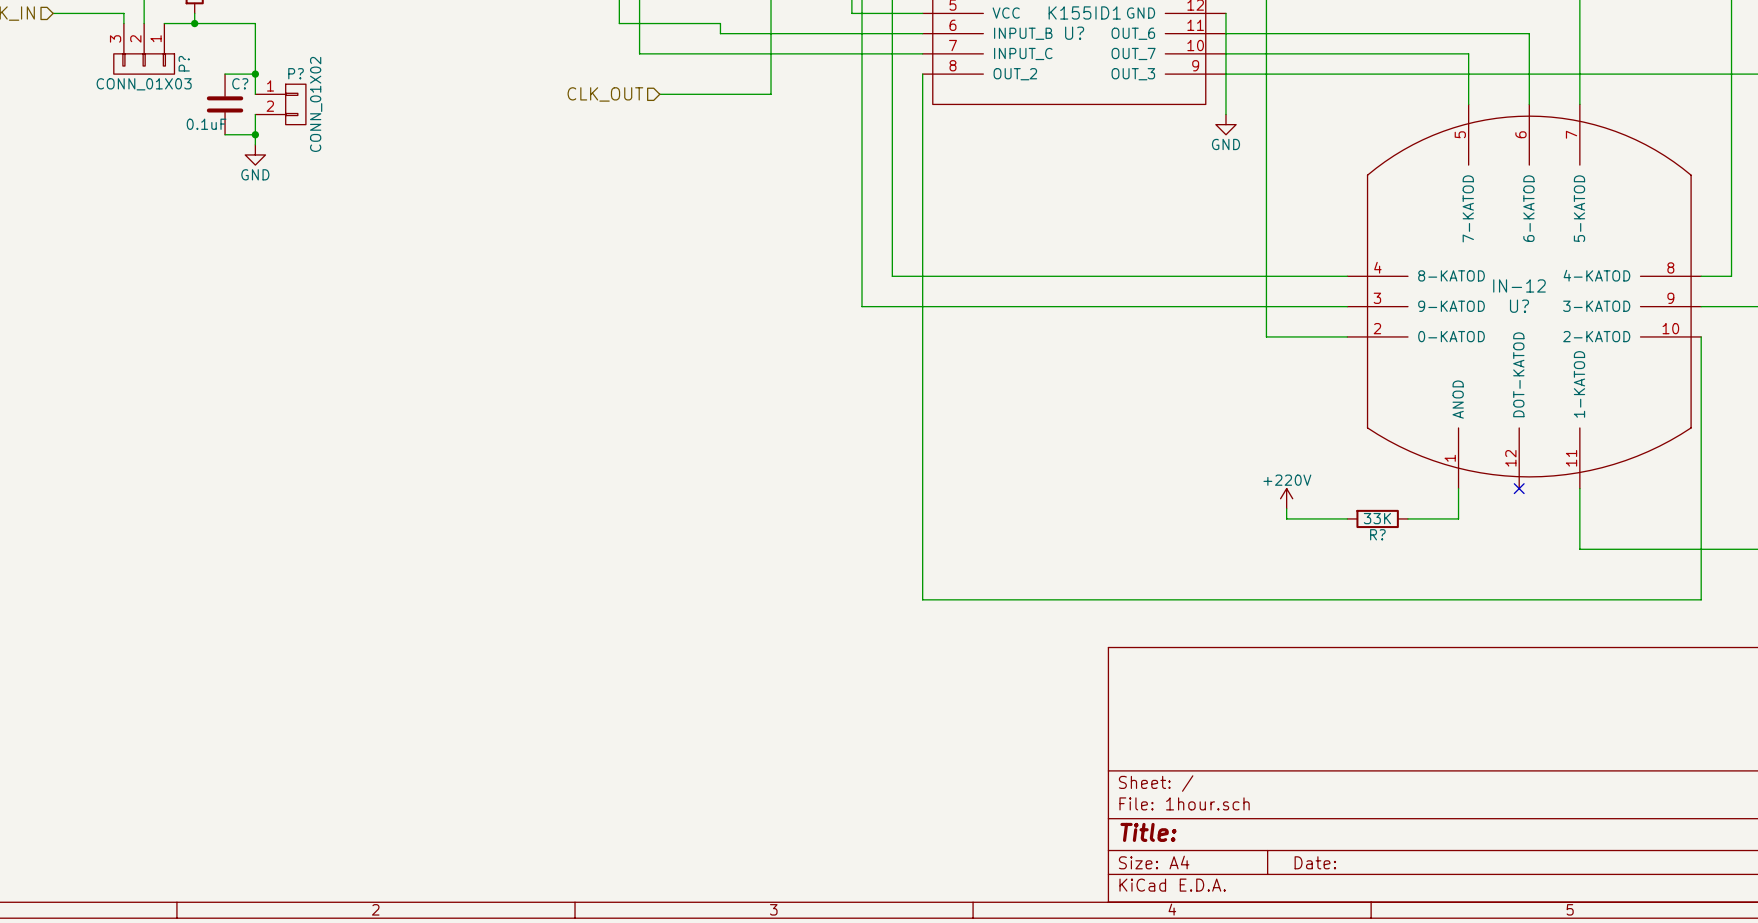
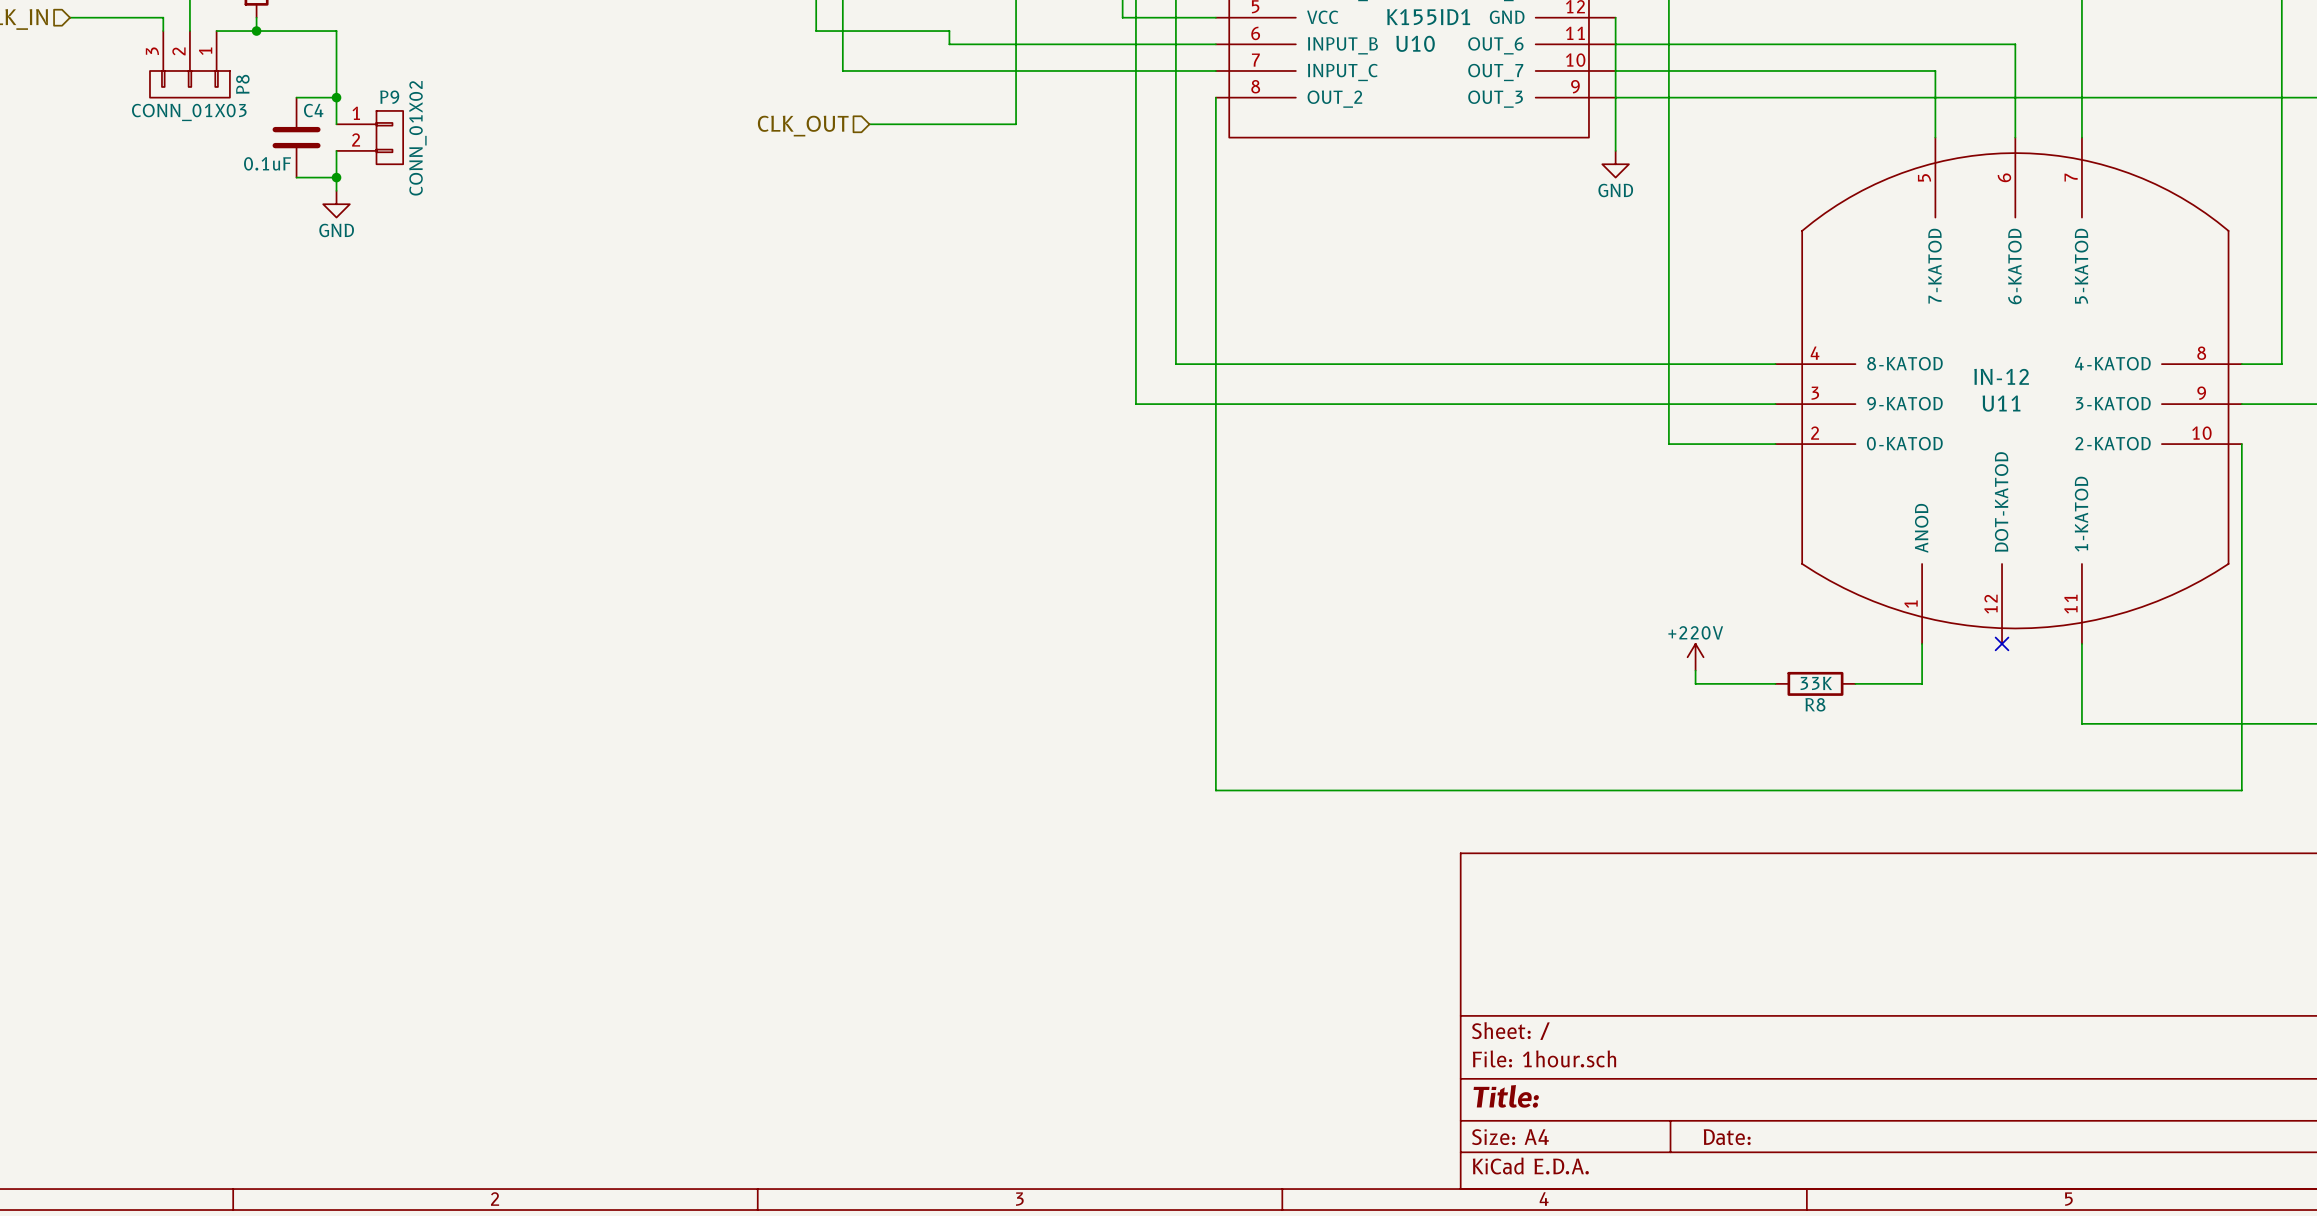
U? name: U? (1074, 33) -> U10 (1415, 43)
P? name: P? (184, 63) -> P8 (242, 84)
P? name: P? (296, 73) -> P9 (389, 97)
C? name: C? (240, 83) -> C4 (313, 110)
U? name: U? (1519, 306) -> U11 (2001, 403)
R? name: R? (1377, 534) -> R8 (1815, 704)

